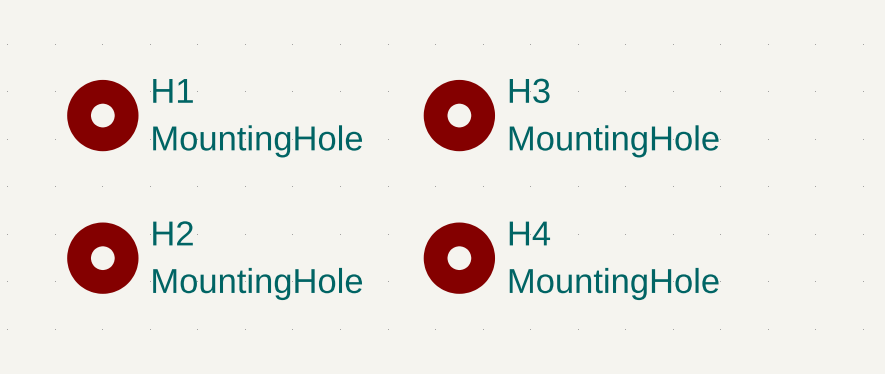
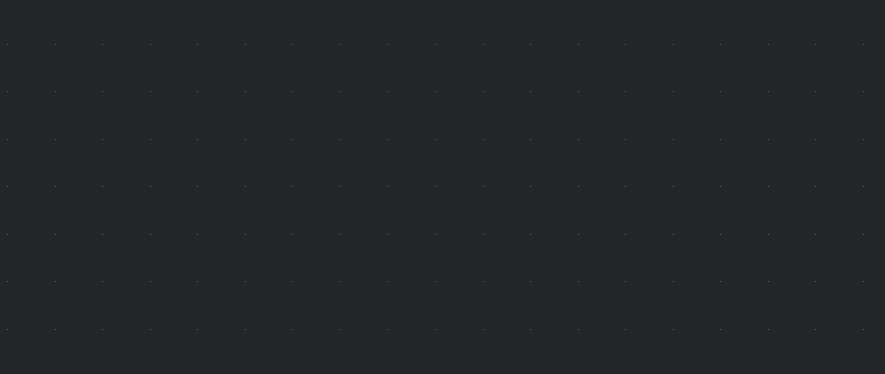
H1: MountingHole (102, 115) -> none
H3: MountingHole (459, 115) -> none
H2: MountingHole (102, 258) -> none
H4: MountingHole (459, 258) -> none

